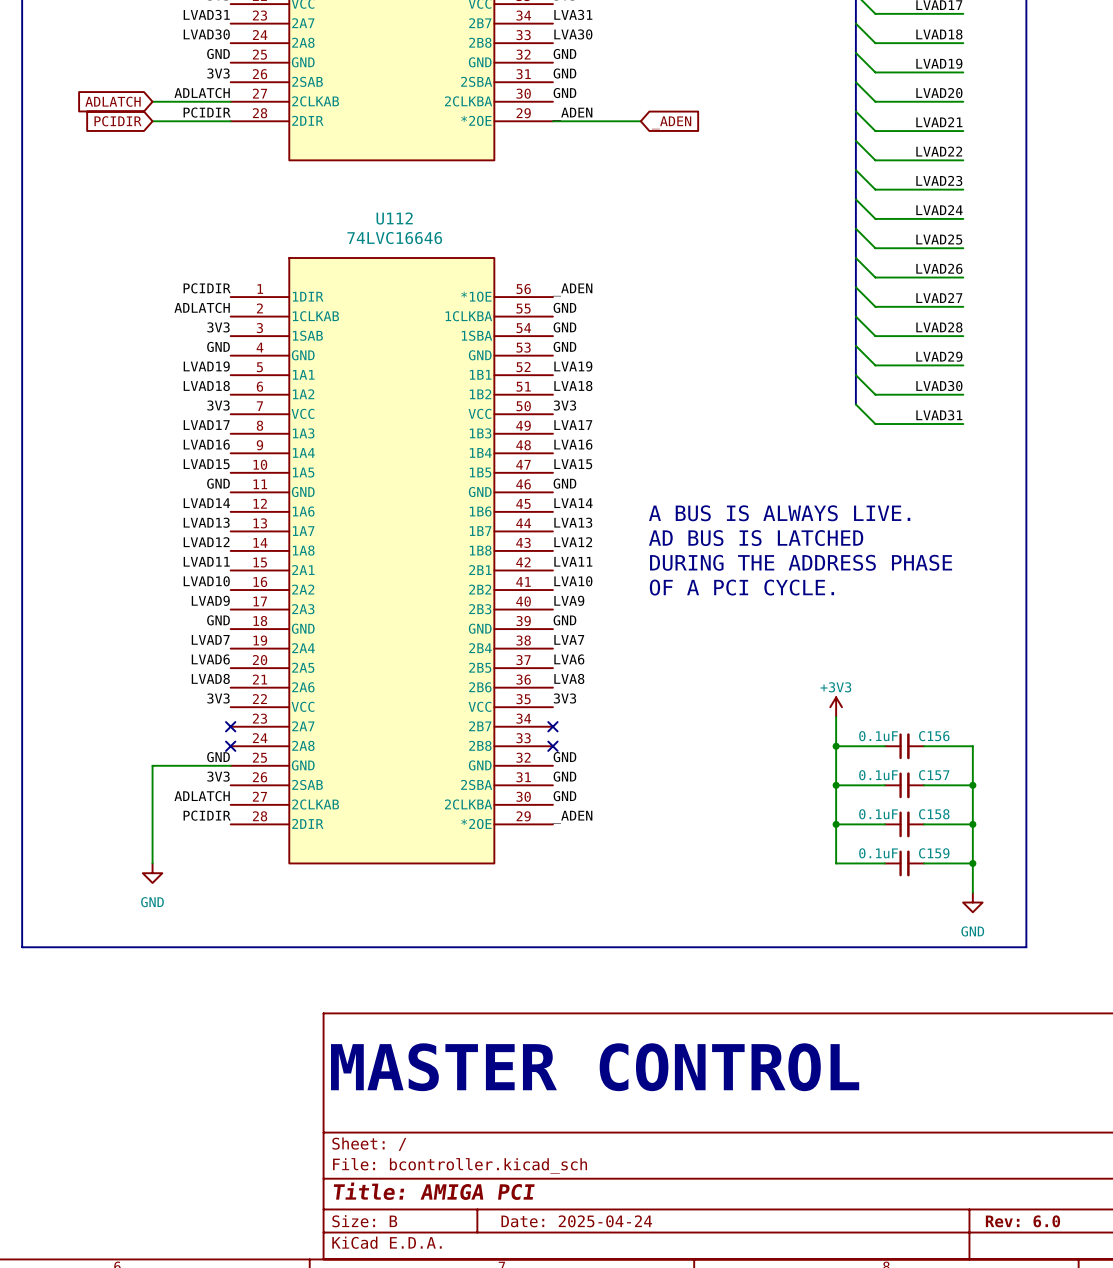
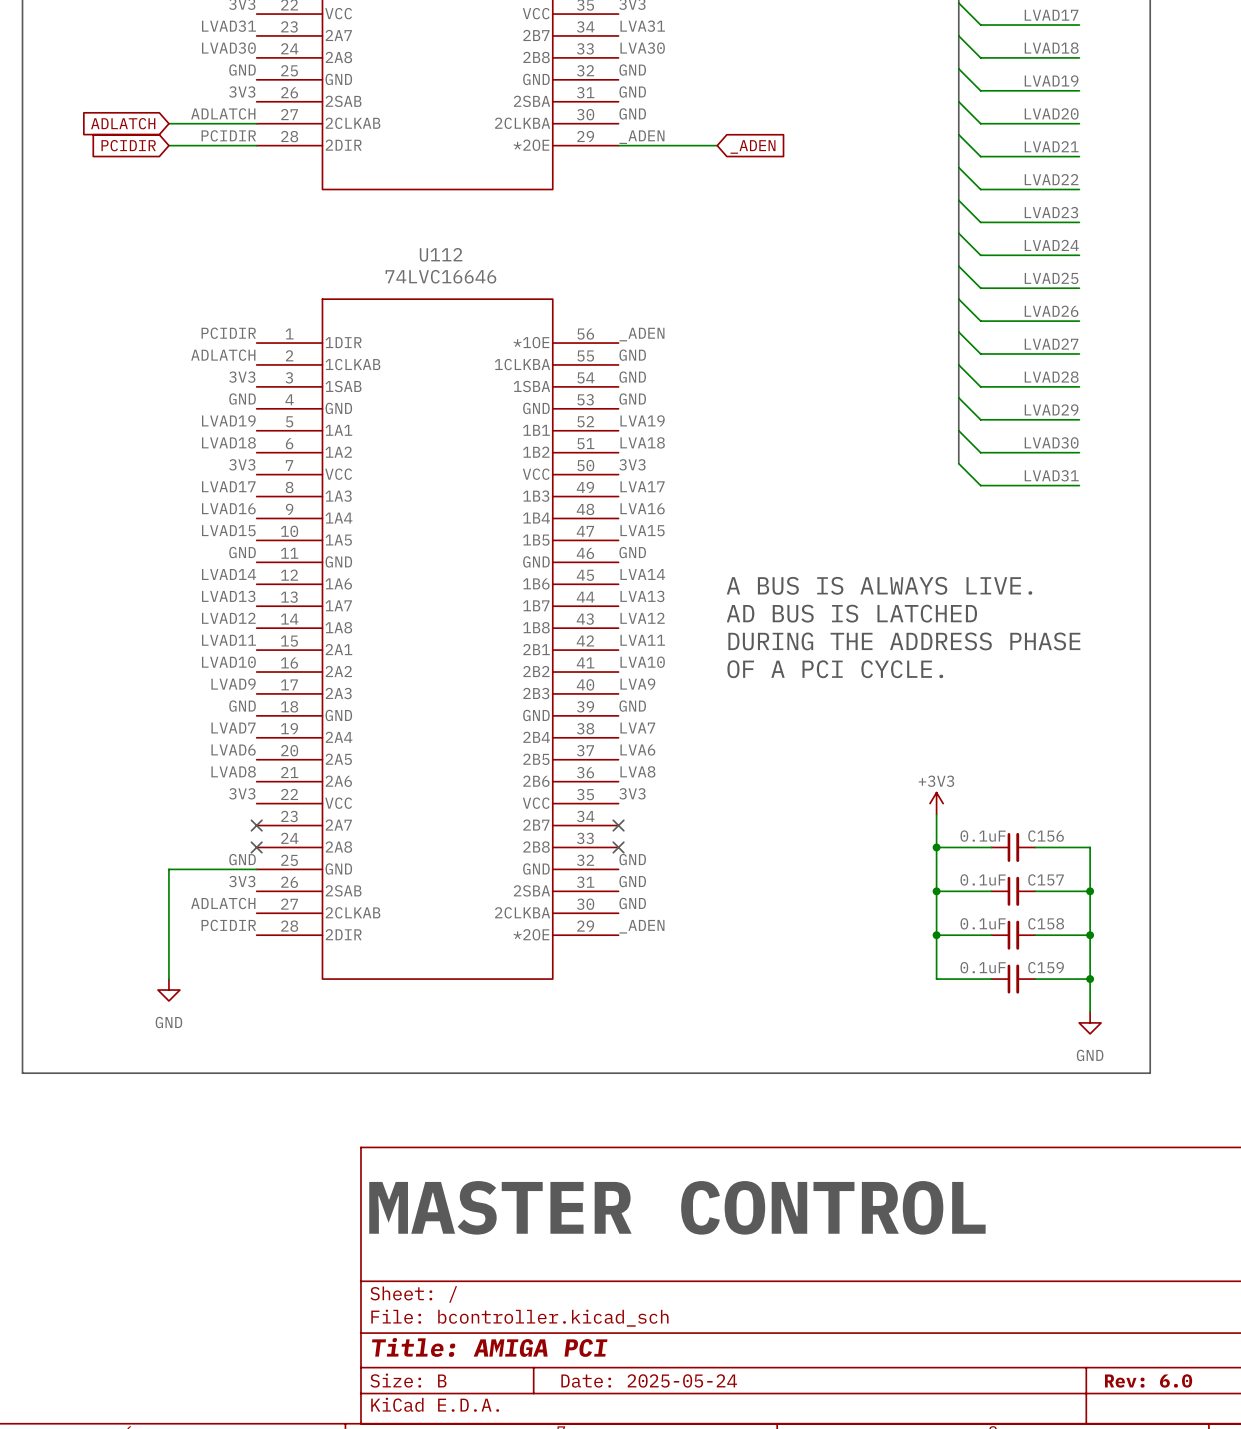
title block: Date: 2025-04-24 (576, 1221) -> Date: 2025-05-24 (649, 1380)

